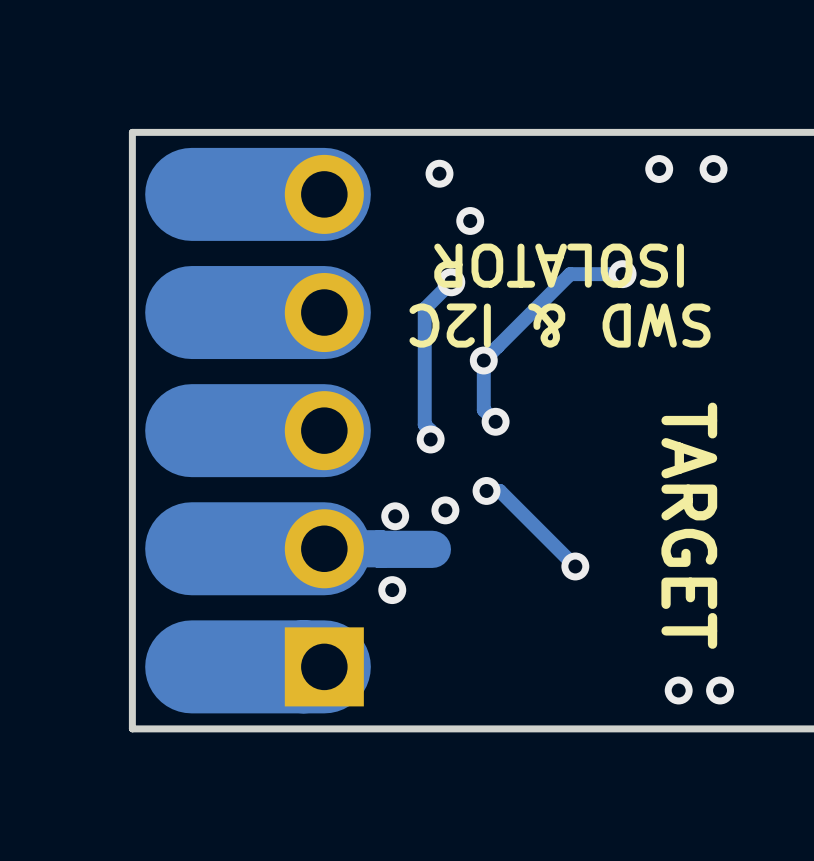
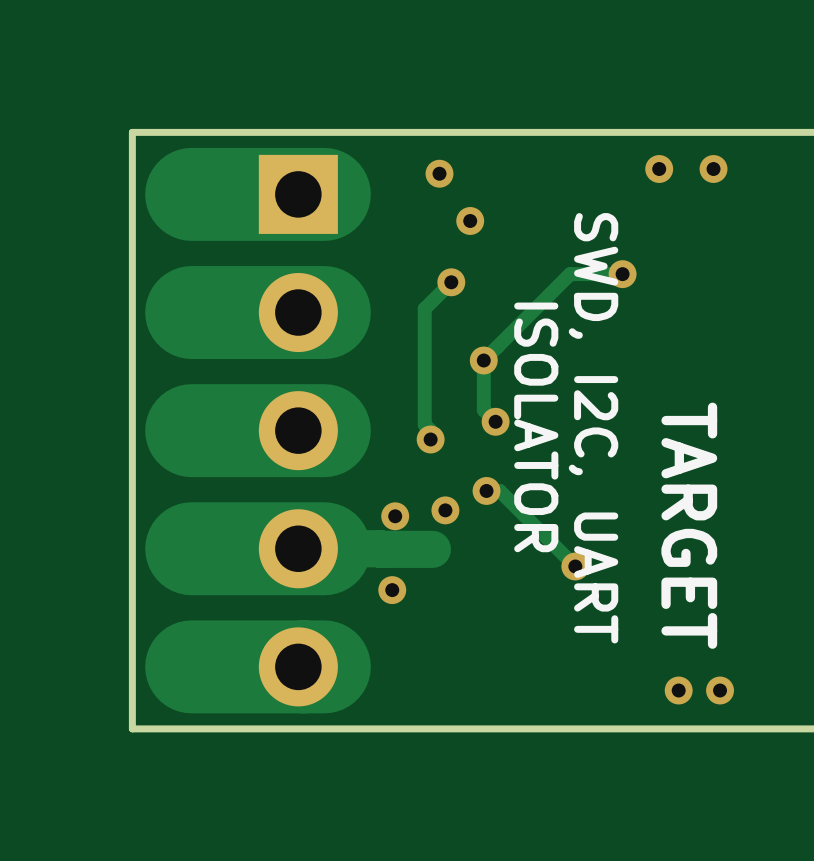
text rotation: 0° (559, 265) -> 90° counterclockwise (536, 427)
text: SWD & I2C (559, 325) -> SWD, I2C, UART (593, 428)
part rotation: 0° (324, 430) -> 180° (298, 430)

